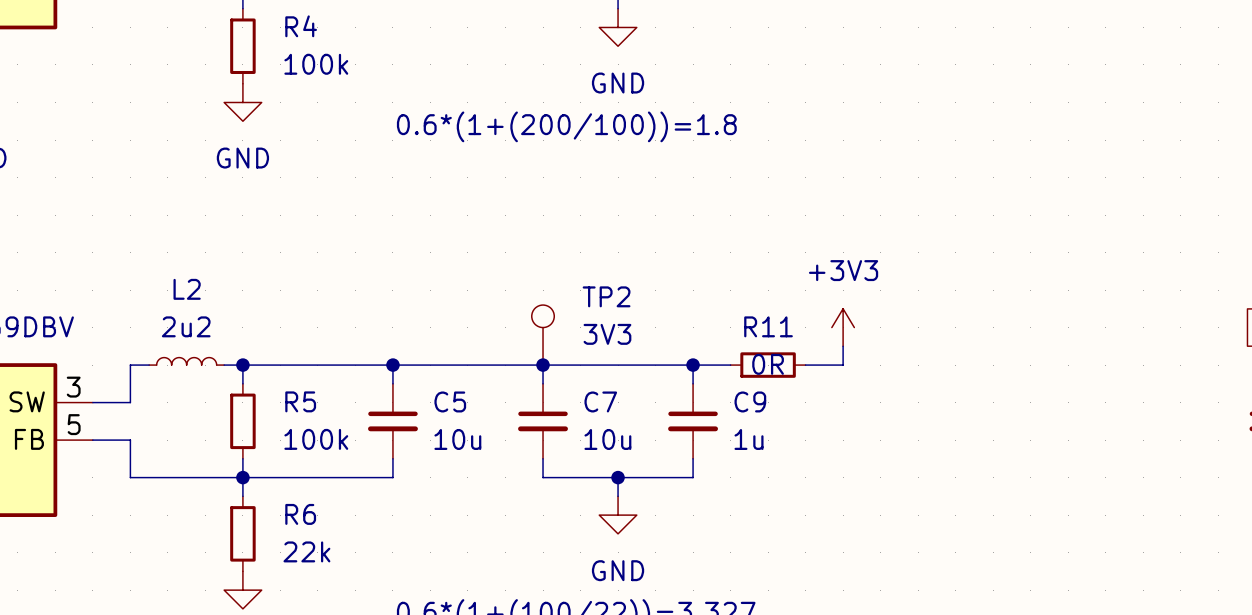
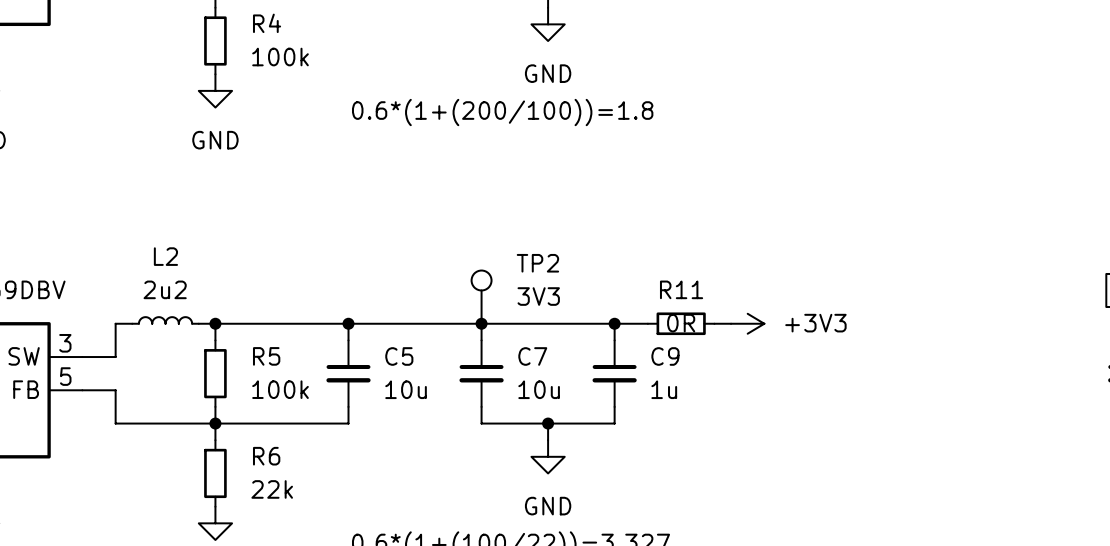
power symbol rotation: 0° (843, 327) -> 90° clockwise (747, 323)
power symbol position: +3V3 (843, 327) -> +3V3 (747, 323)

